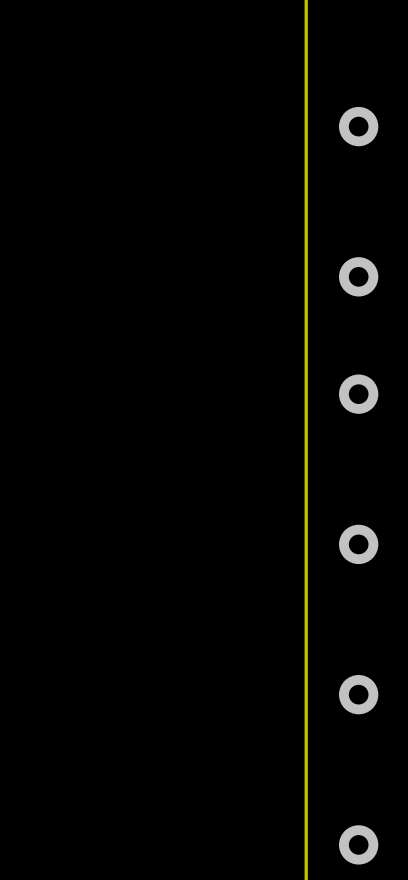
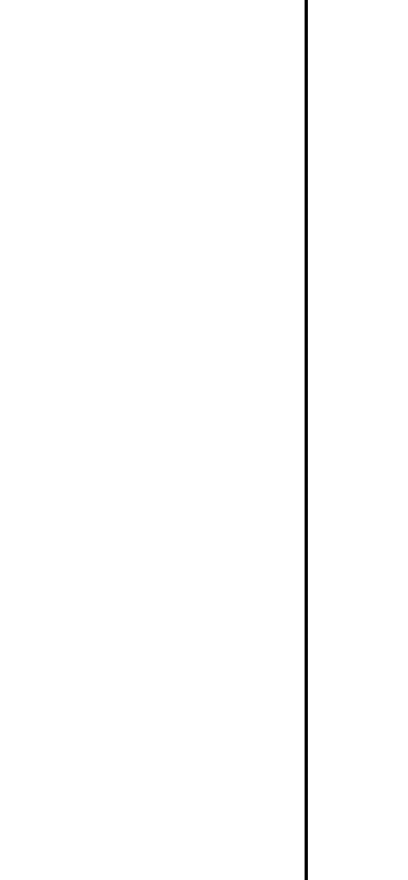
via: (358, 126) -> none
via: (358, 276) -> none
via: (358, 394) -> none
via: (358, 544) -> none
via: (358, 694) -> none
via: (358, 844) -> none

